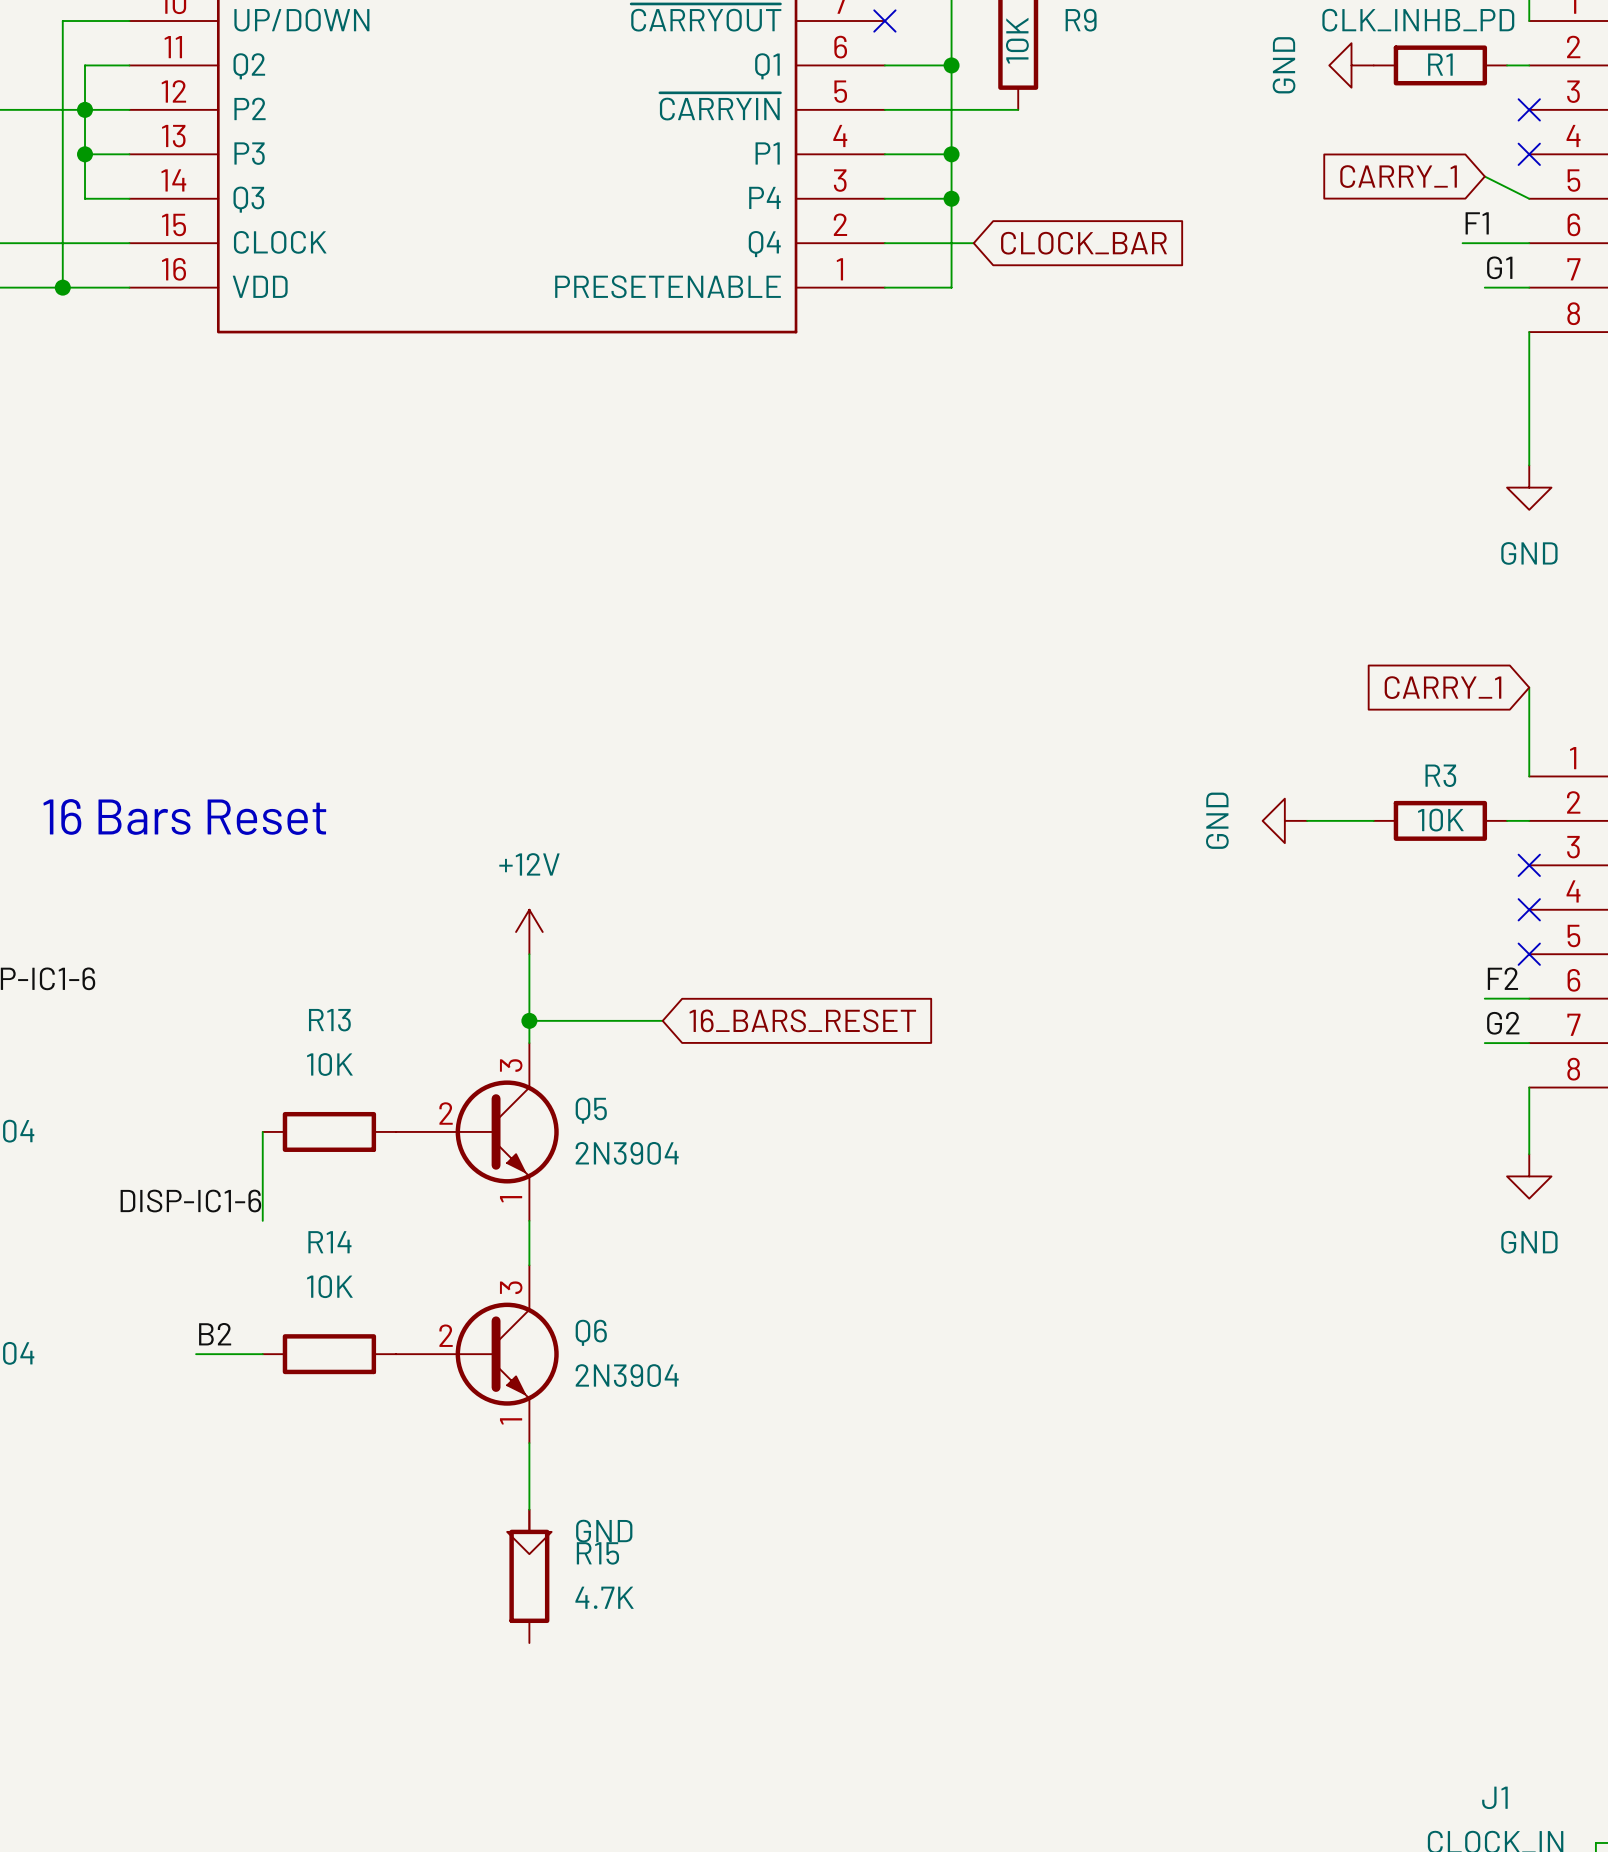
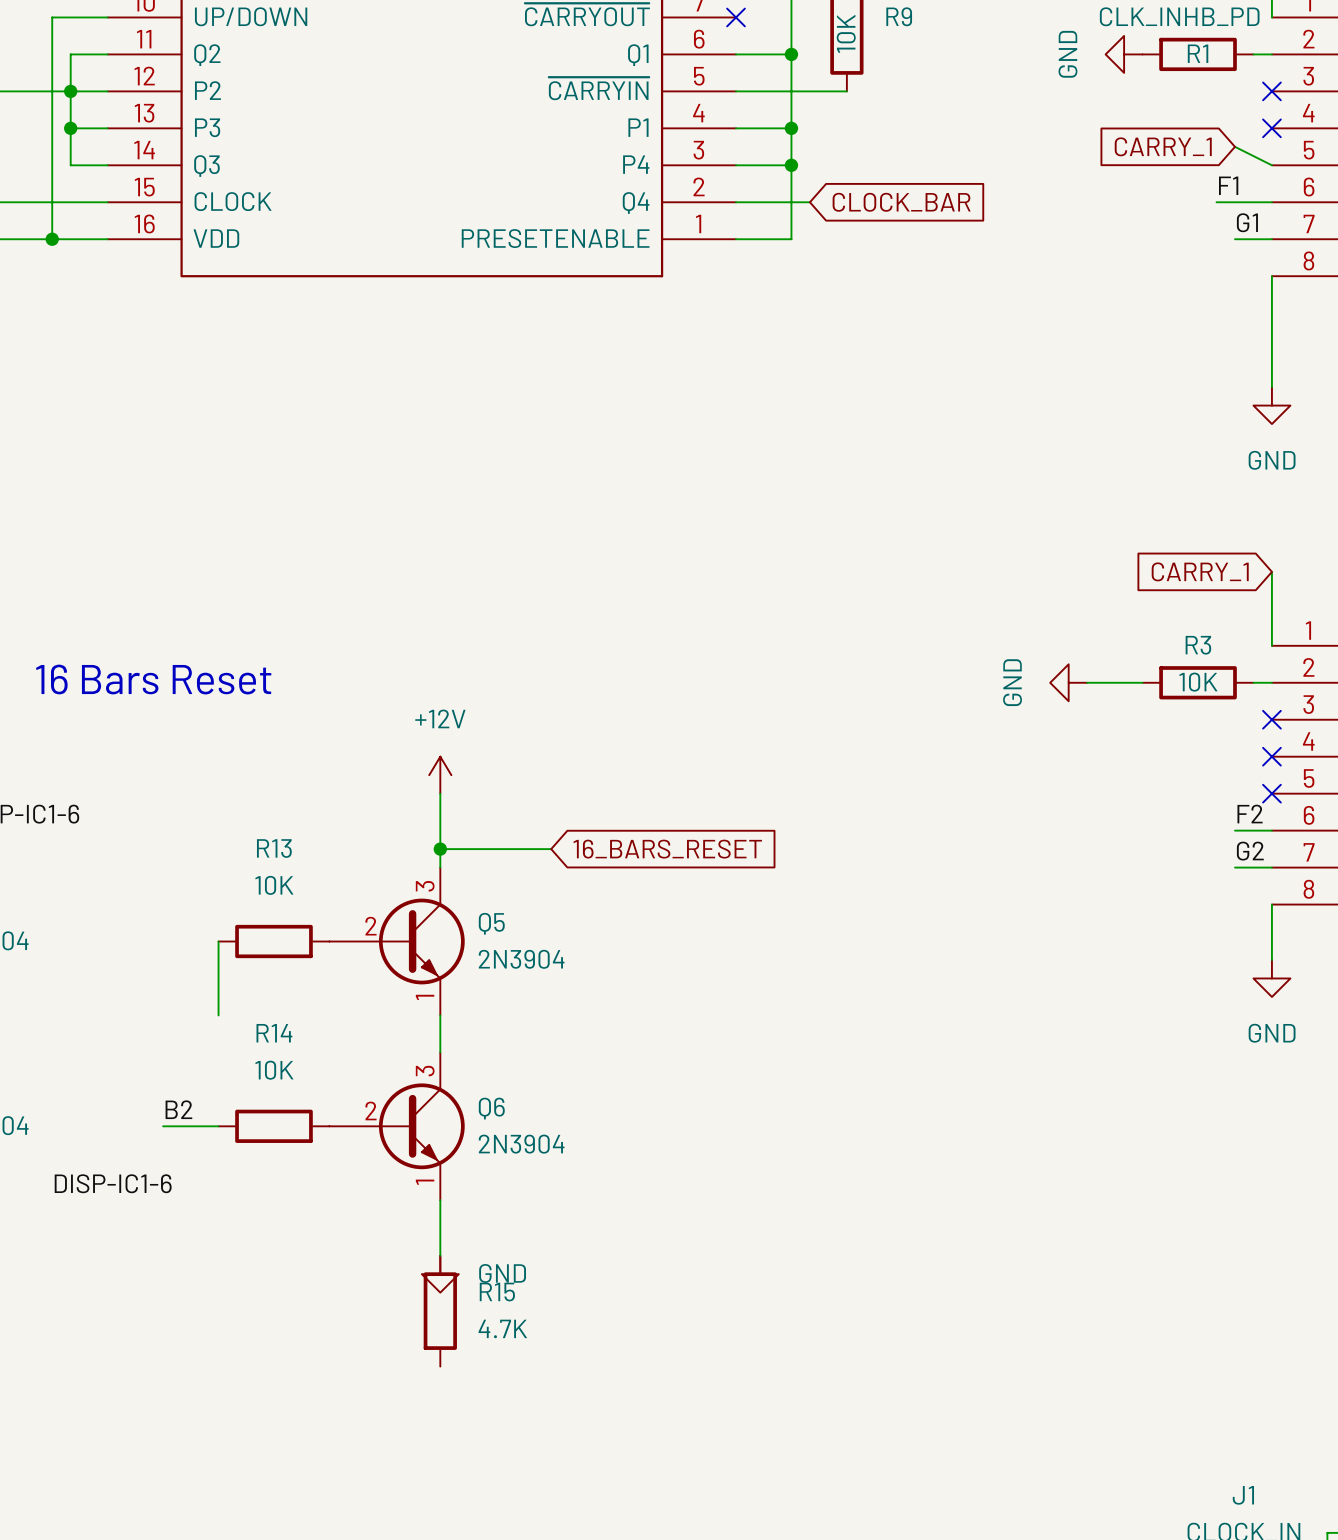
label position: DISP-IC1-6 (190, 1201) -> DISP-IC1-6 (113, 1183)

